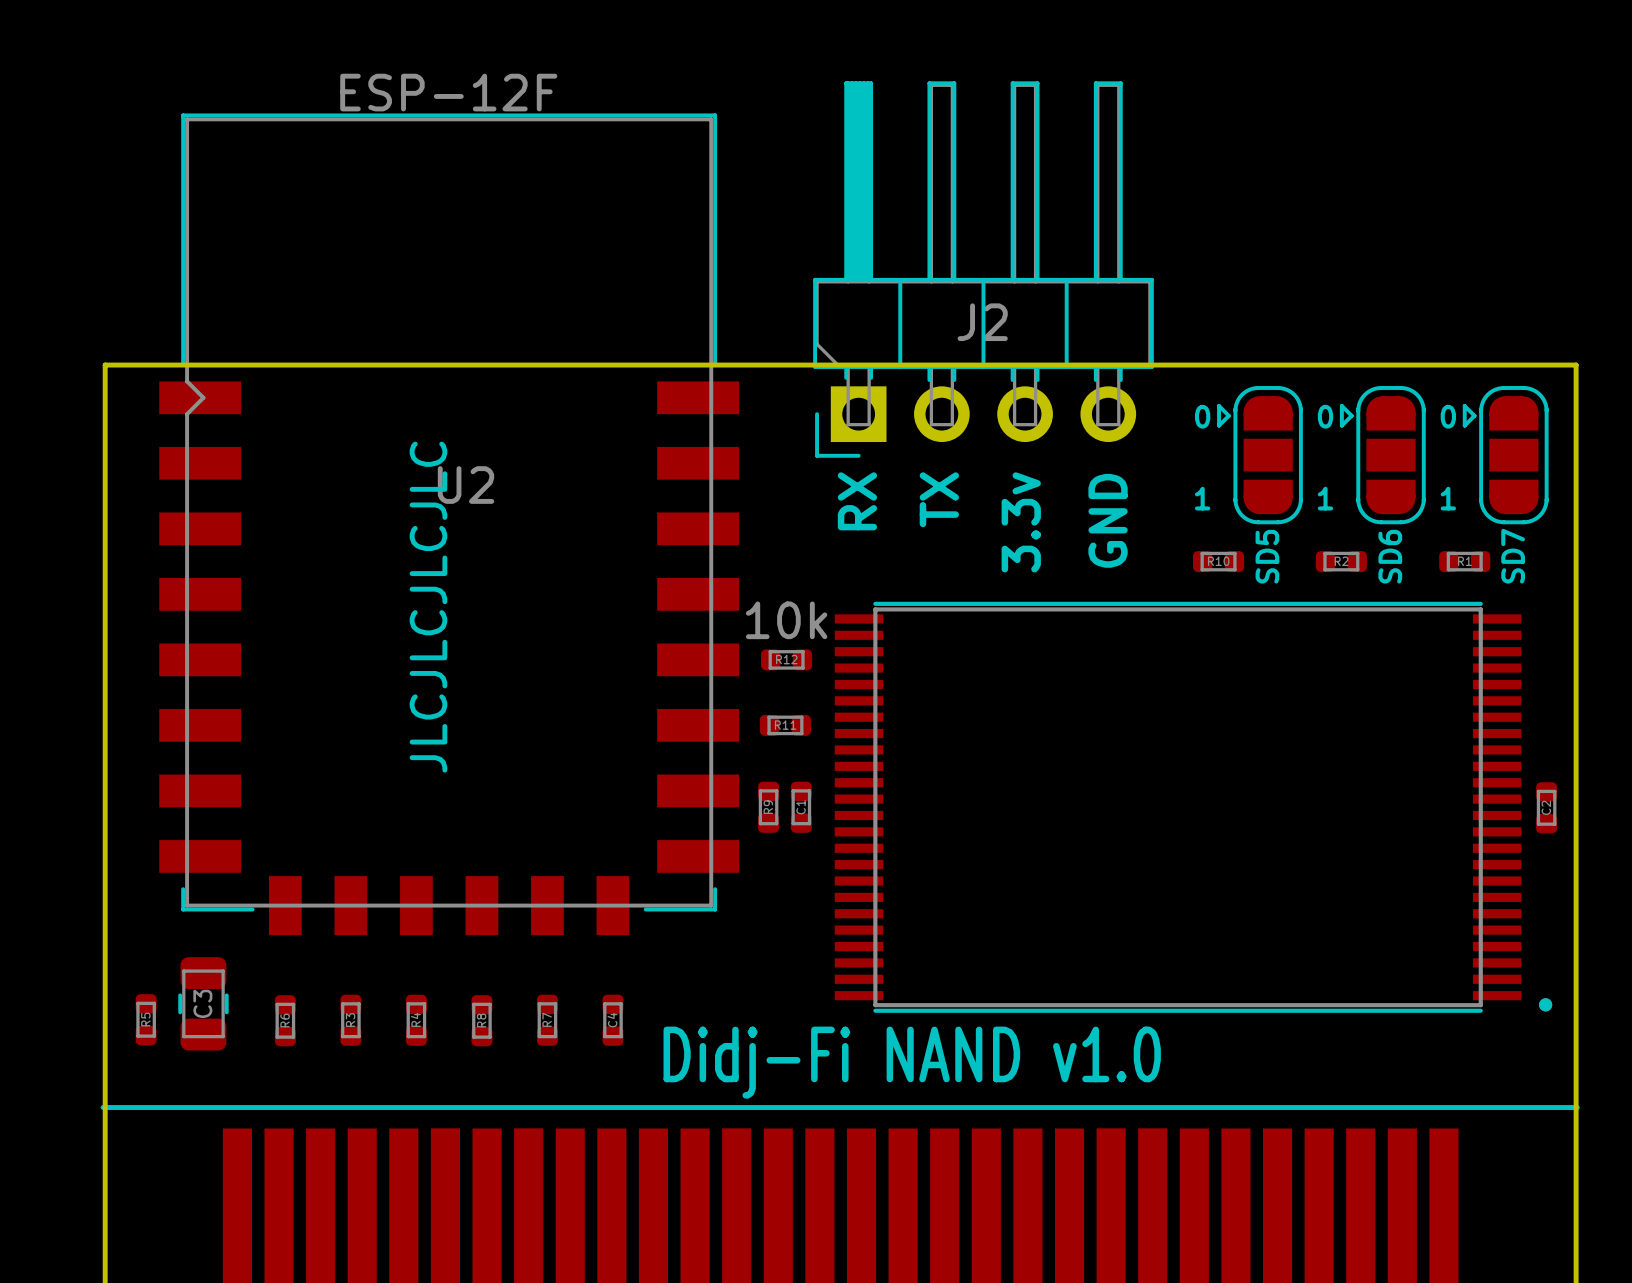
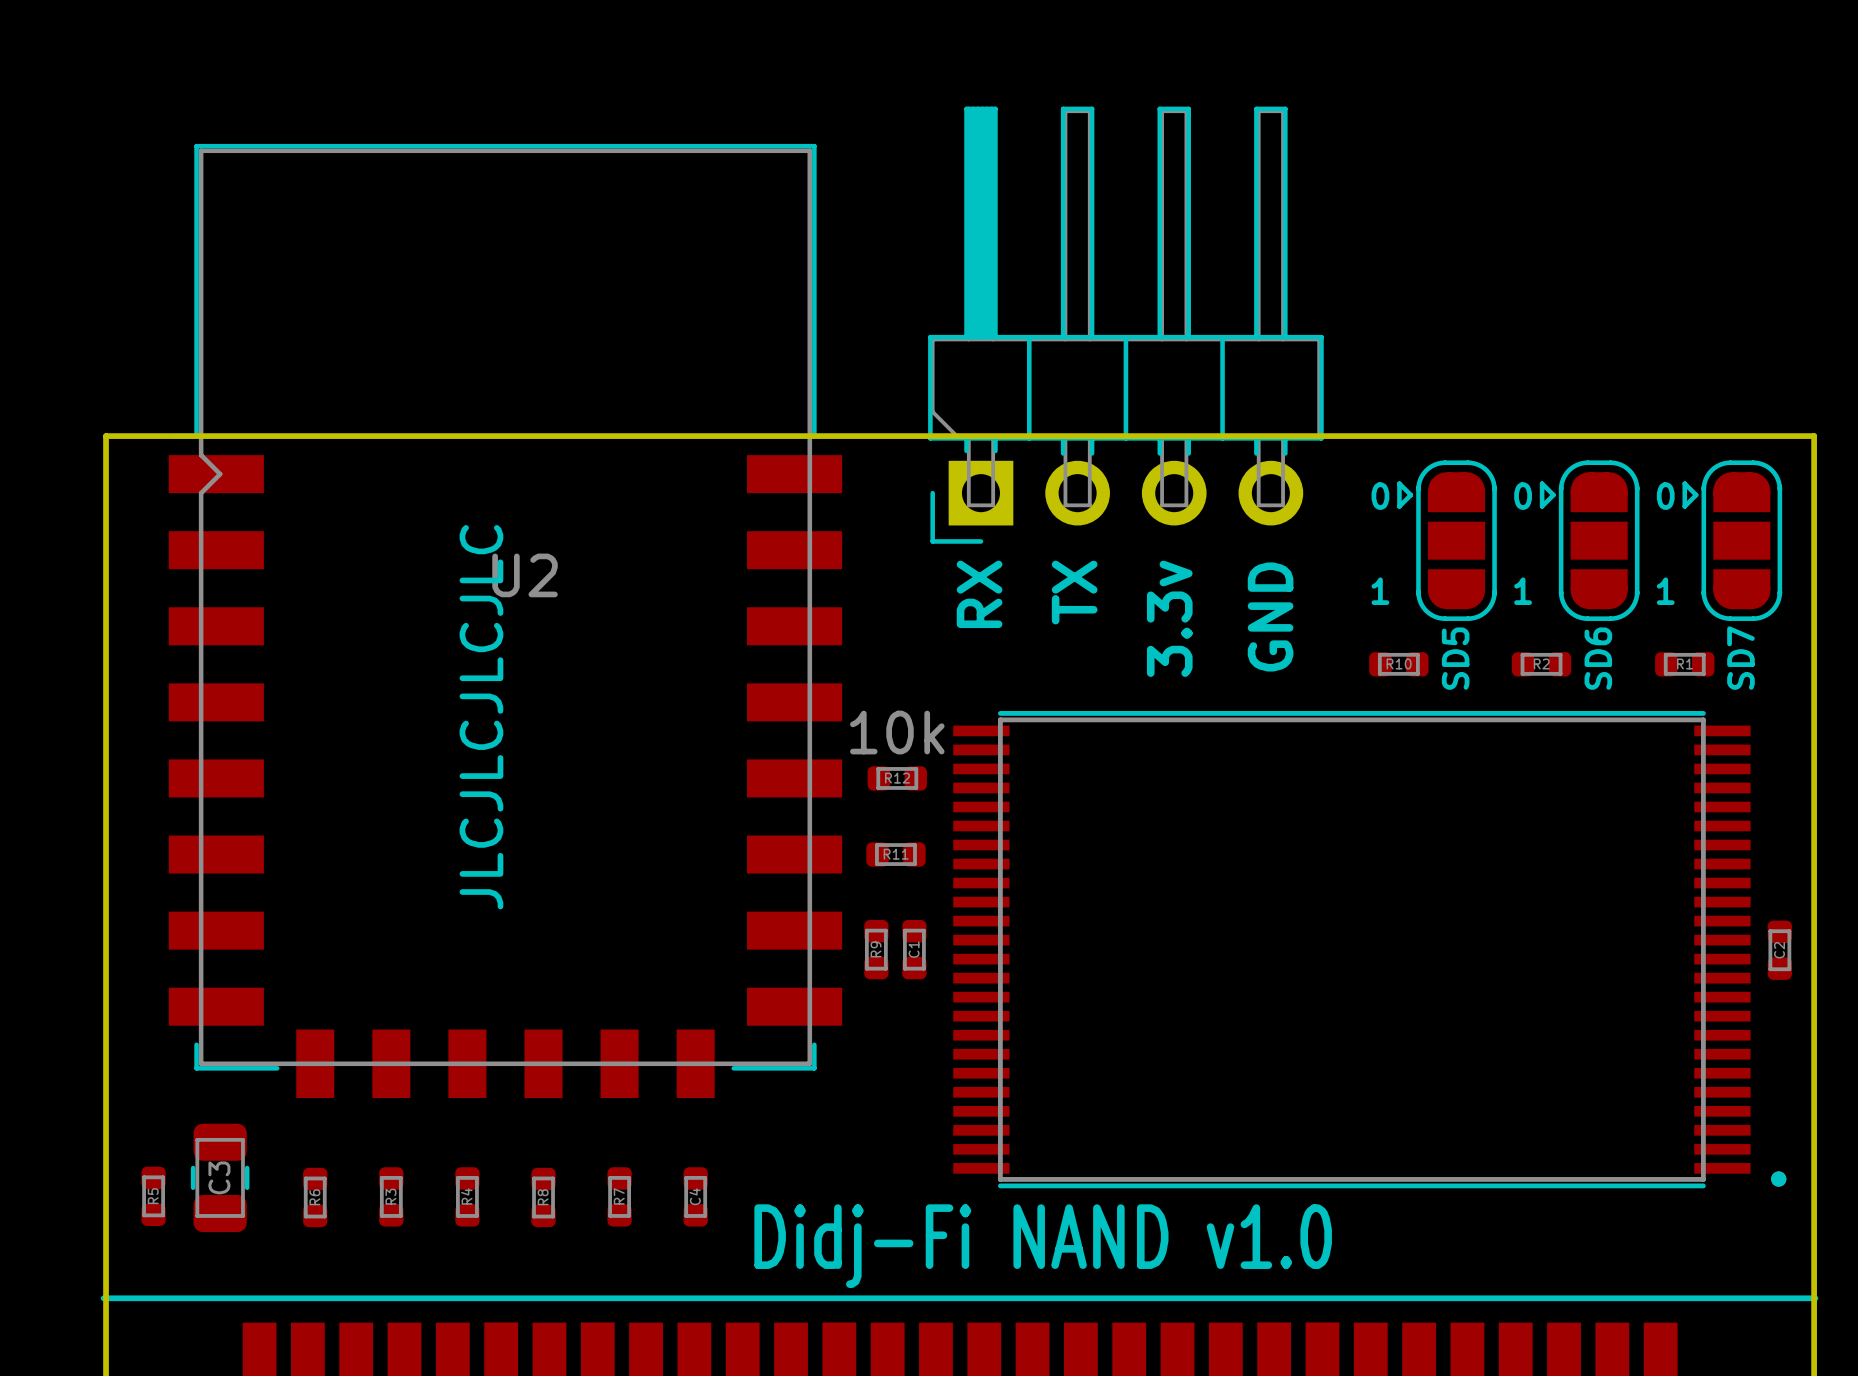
U2 value: ESP-12F (448, 92) -> none
J2 name: J2 (982, 322) -> none

